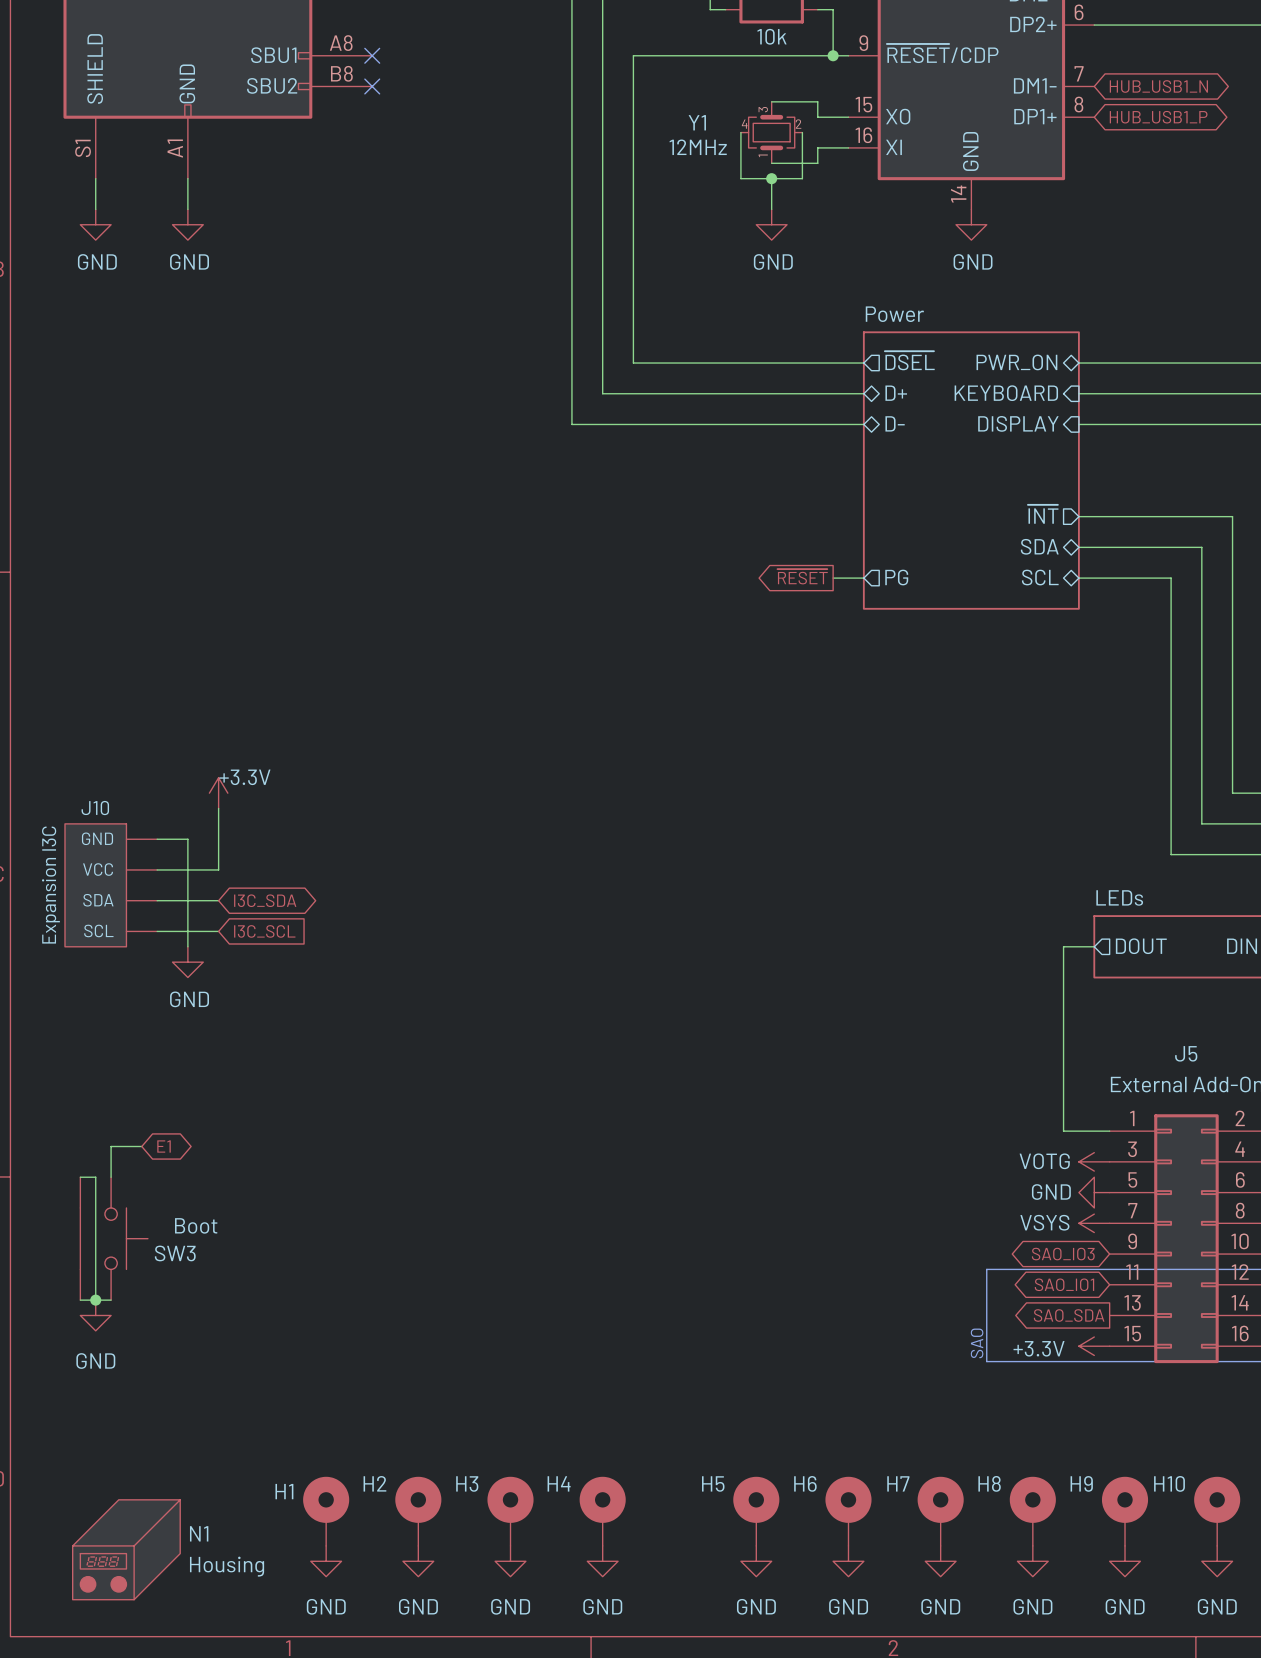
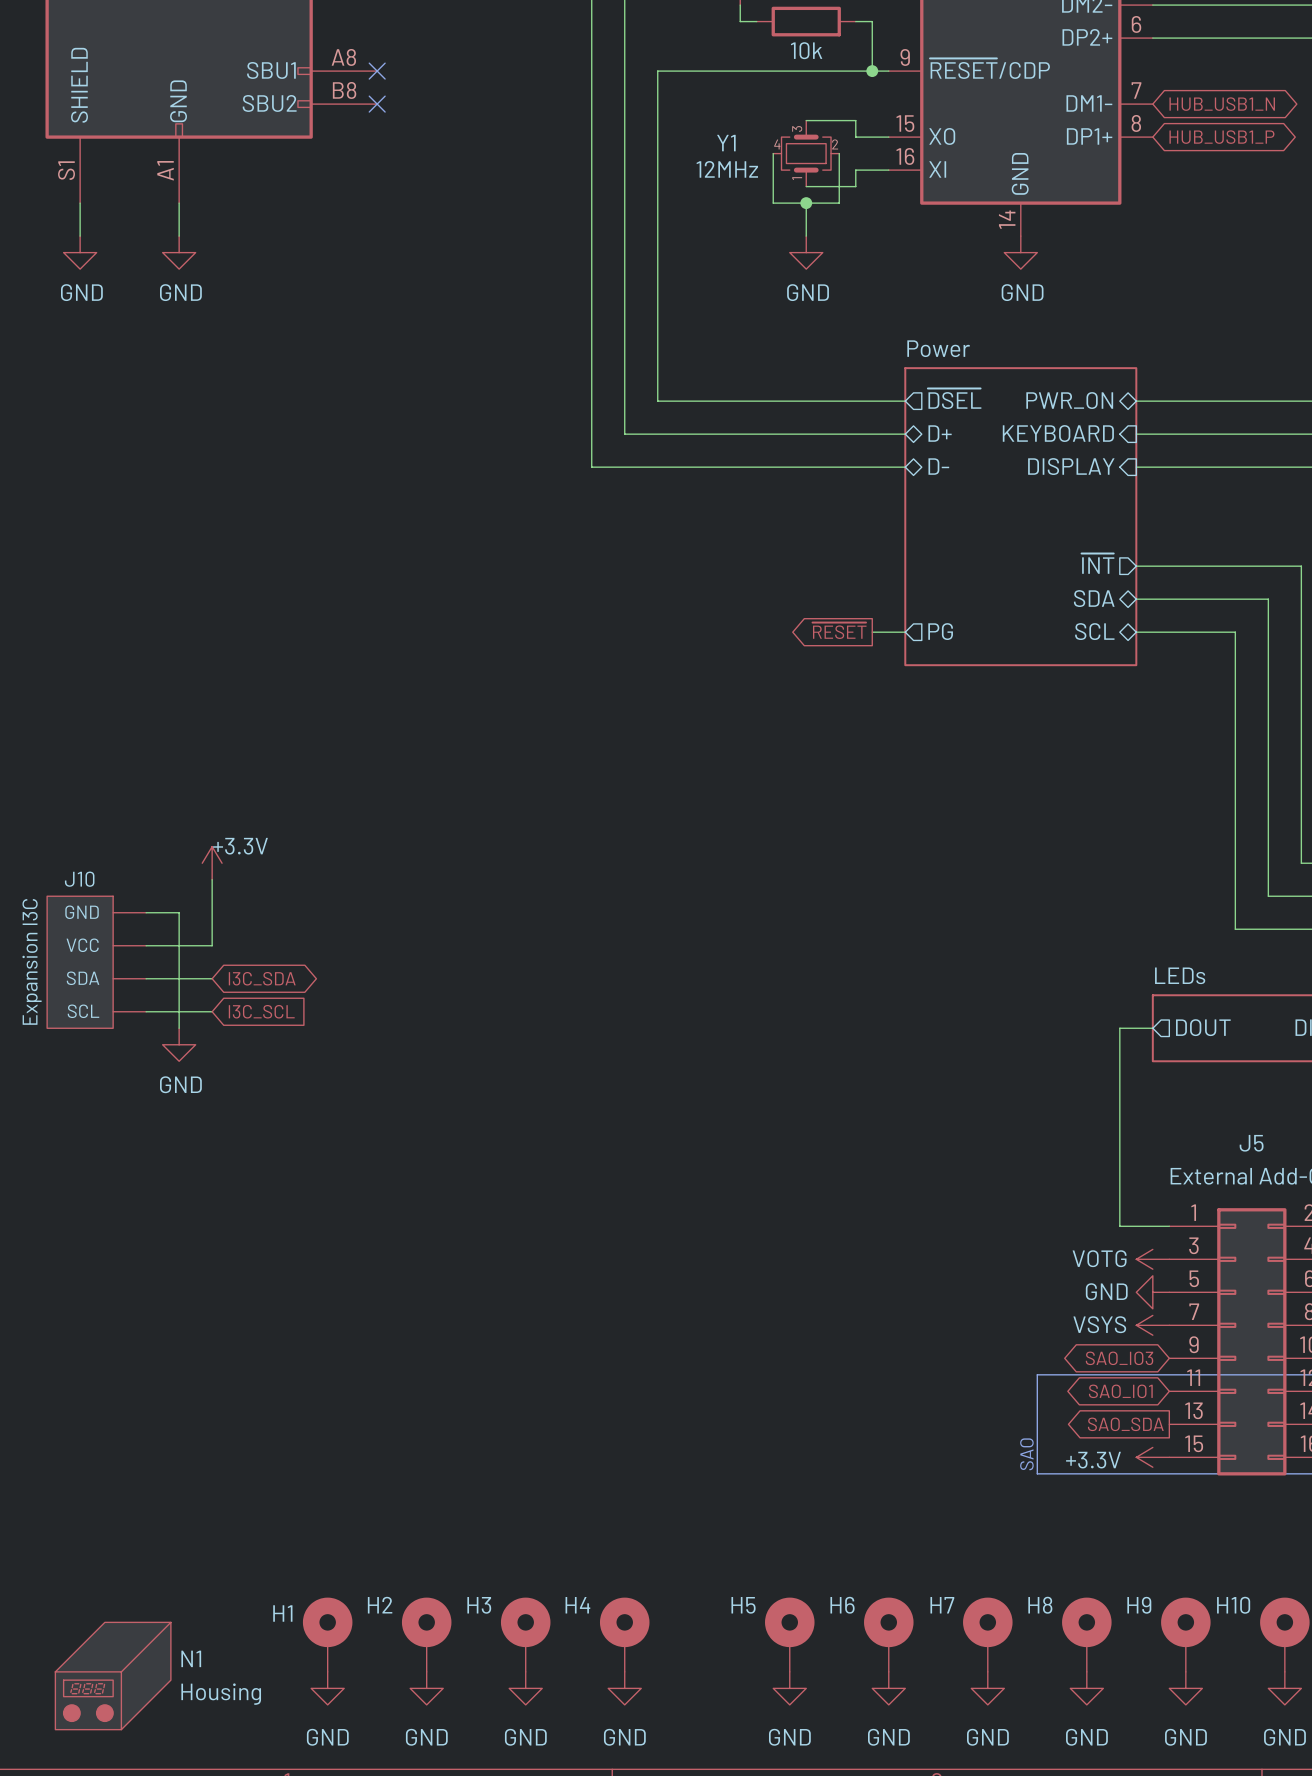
wire: (141, 1146) (111, 1146) (111, 1177) -> none
global label: E1 (164, 1146) -> none
wire: (80, 1177) (95, 1177) (95, 1300) -> none
SW3: Boot (114, 1238) -> none
wire: (80, 1300) (111, 1300) -> none
junction: (95, 1300) -> none
power symbol: GND (95, 1315) -> none

